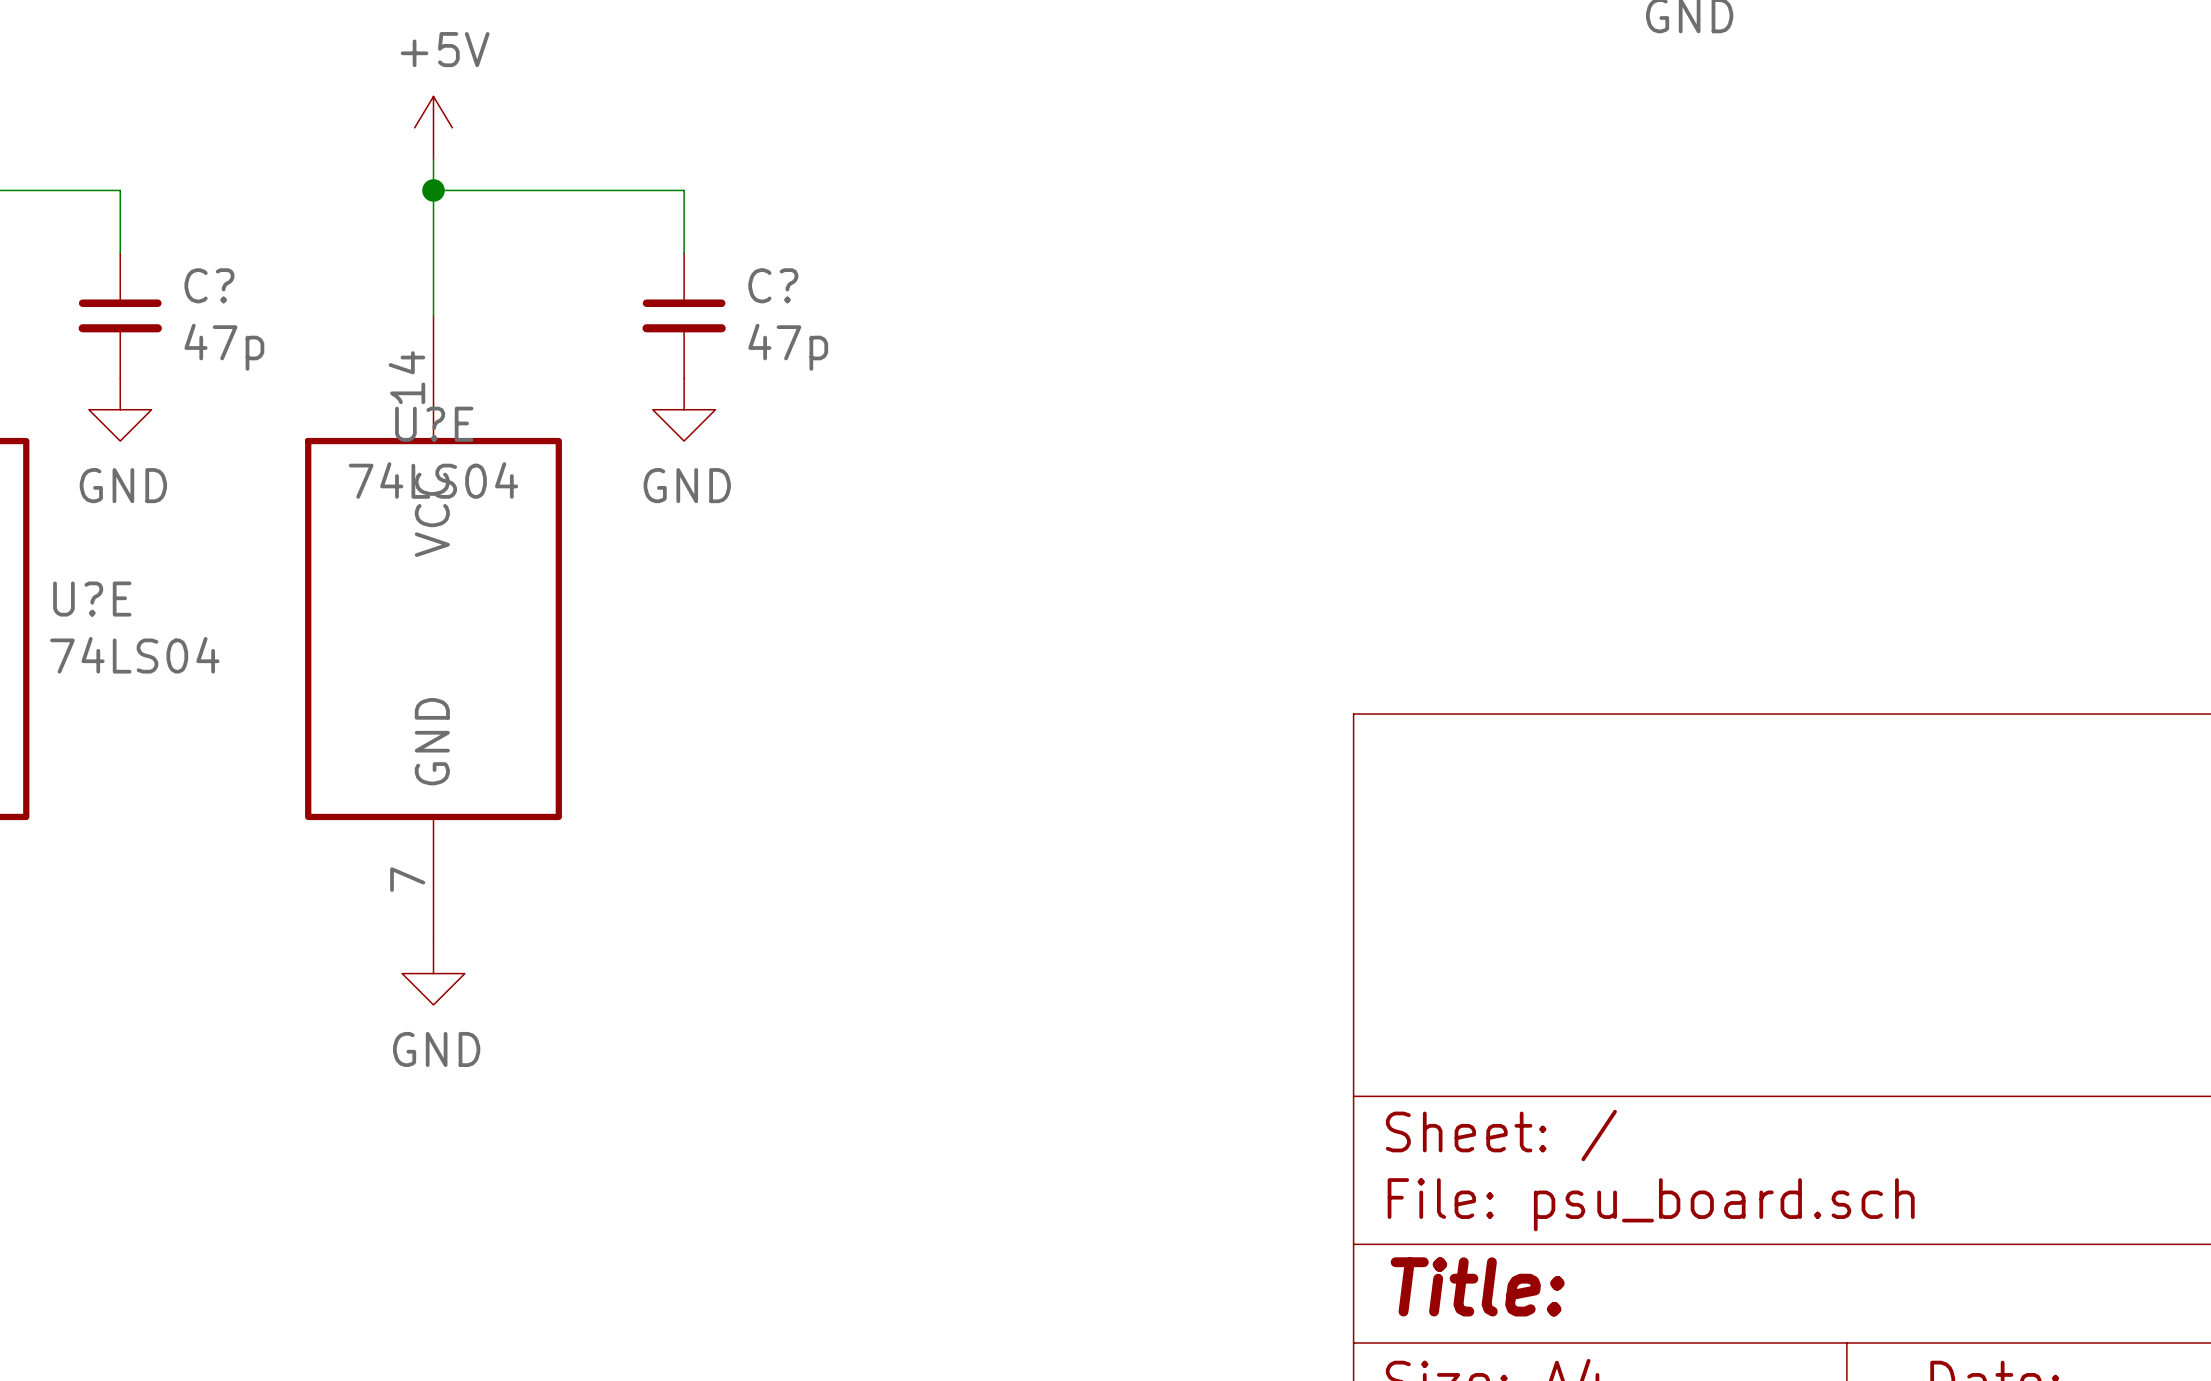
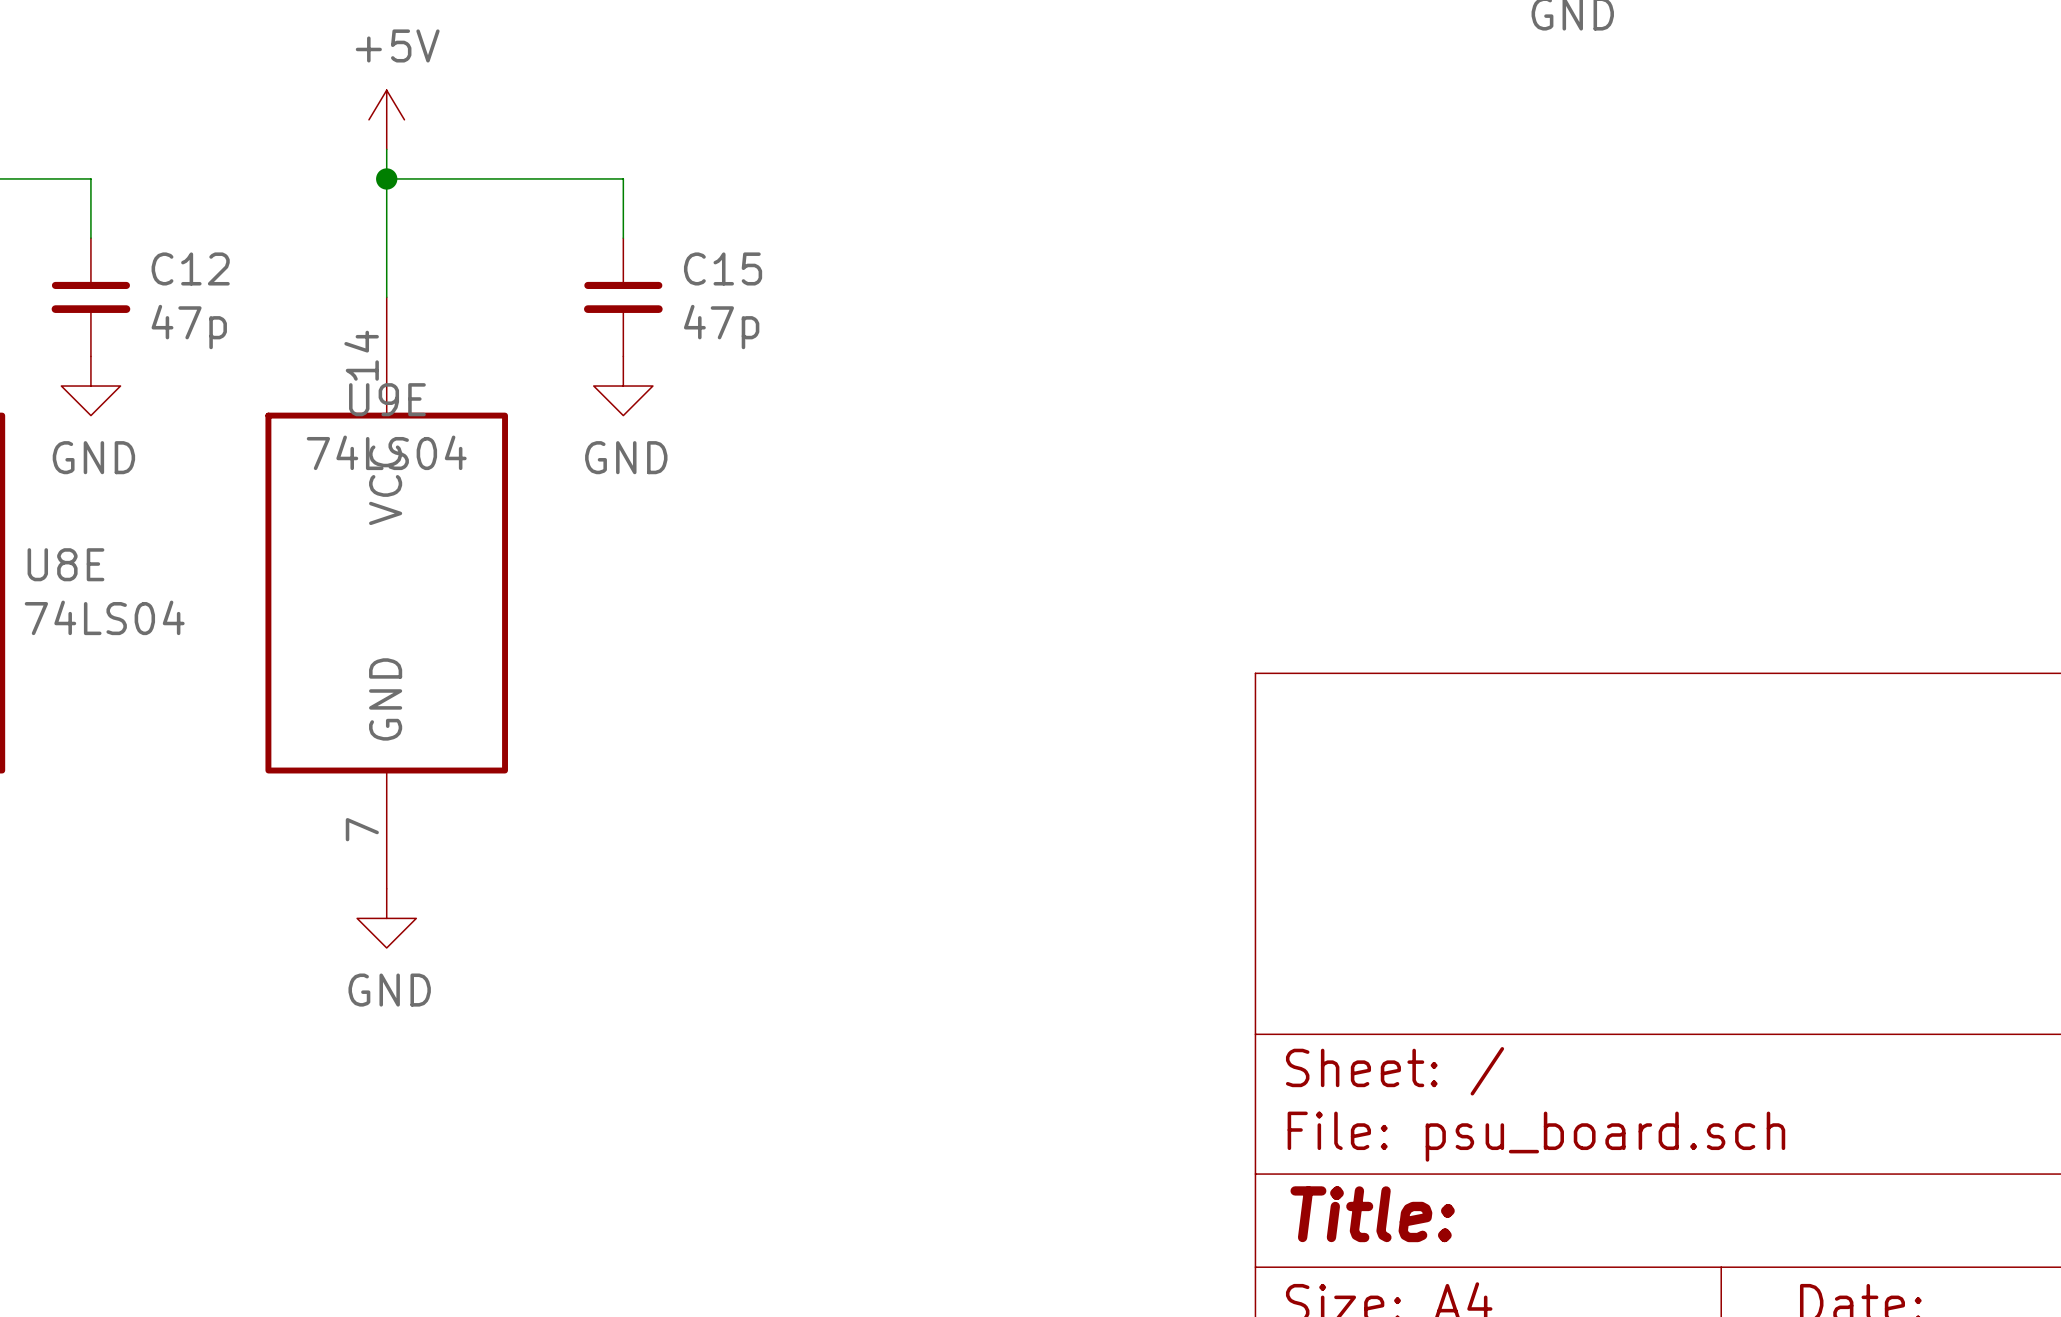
C? name: C? (209, 285) -> C12 (190, 268)
C? name: C? (773, 285) -> C15 (723, 268)
U?E name: U?E (434, 424) -> U9E (387, 399)
U?E name: U?E (92, 599) -> U8E (65, 564)

